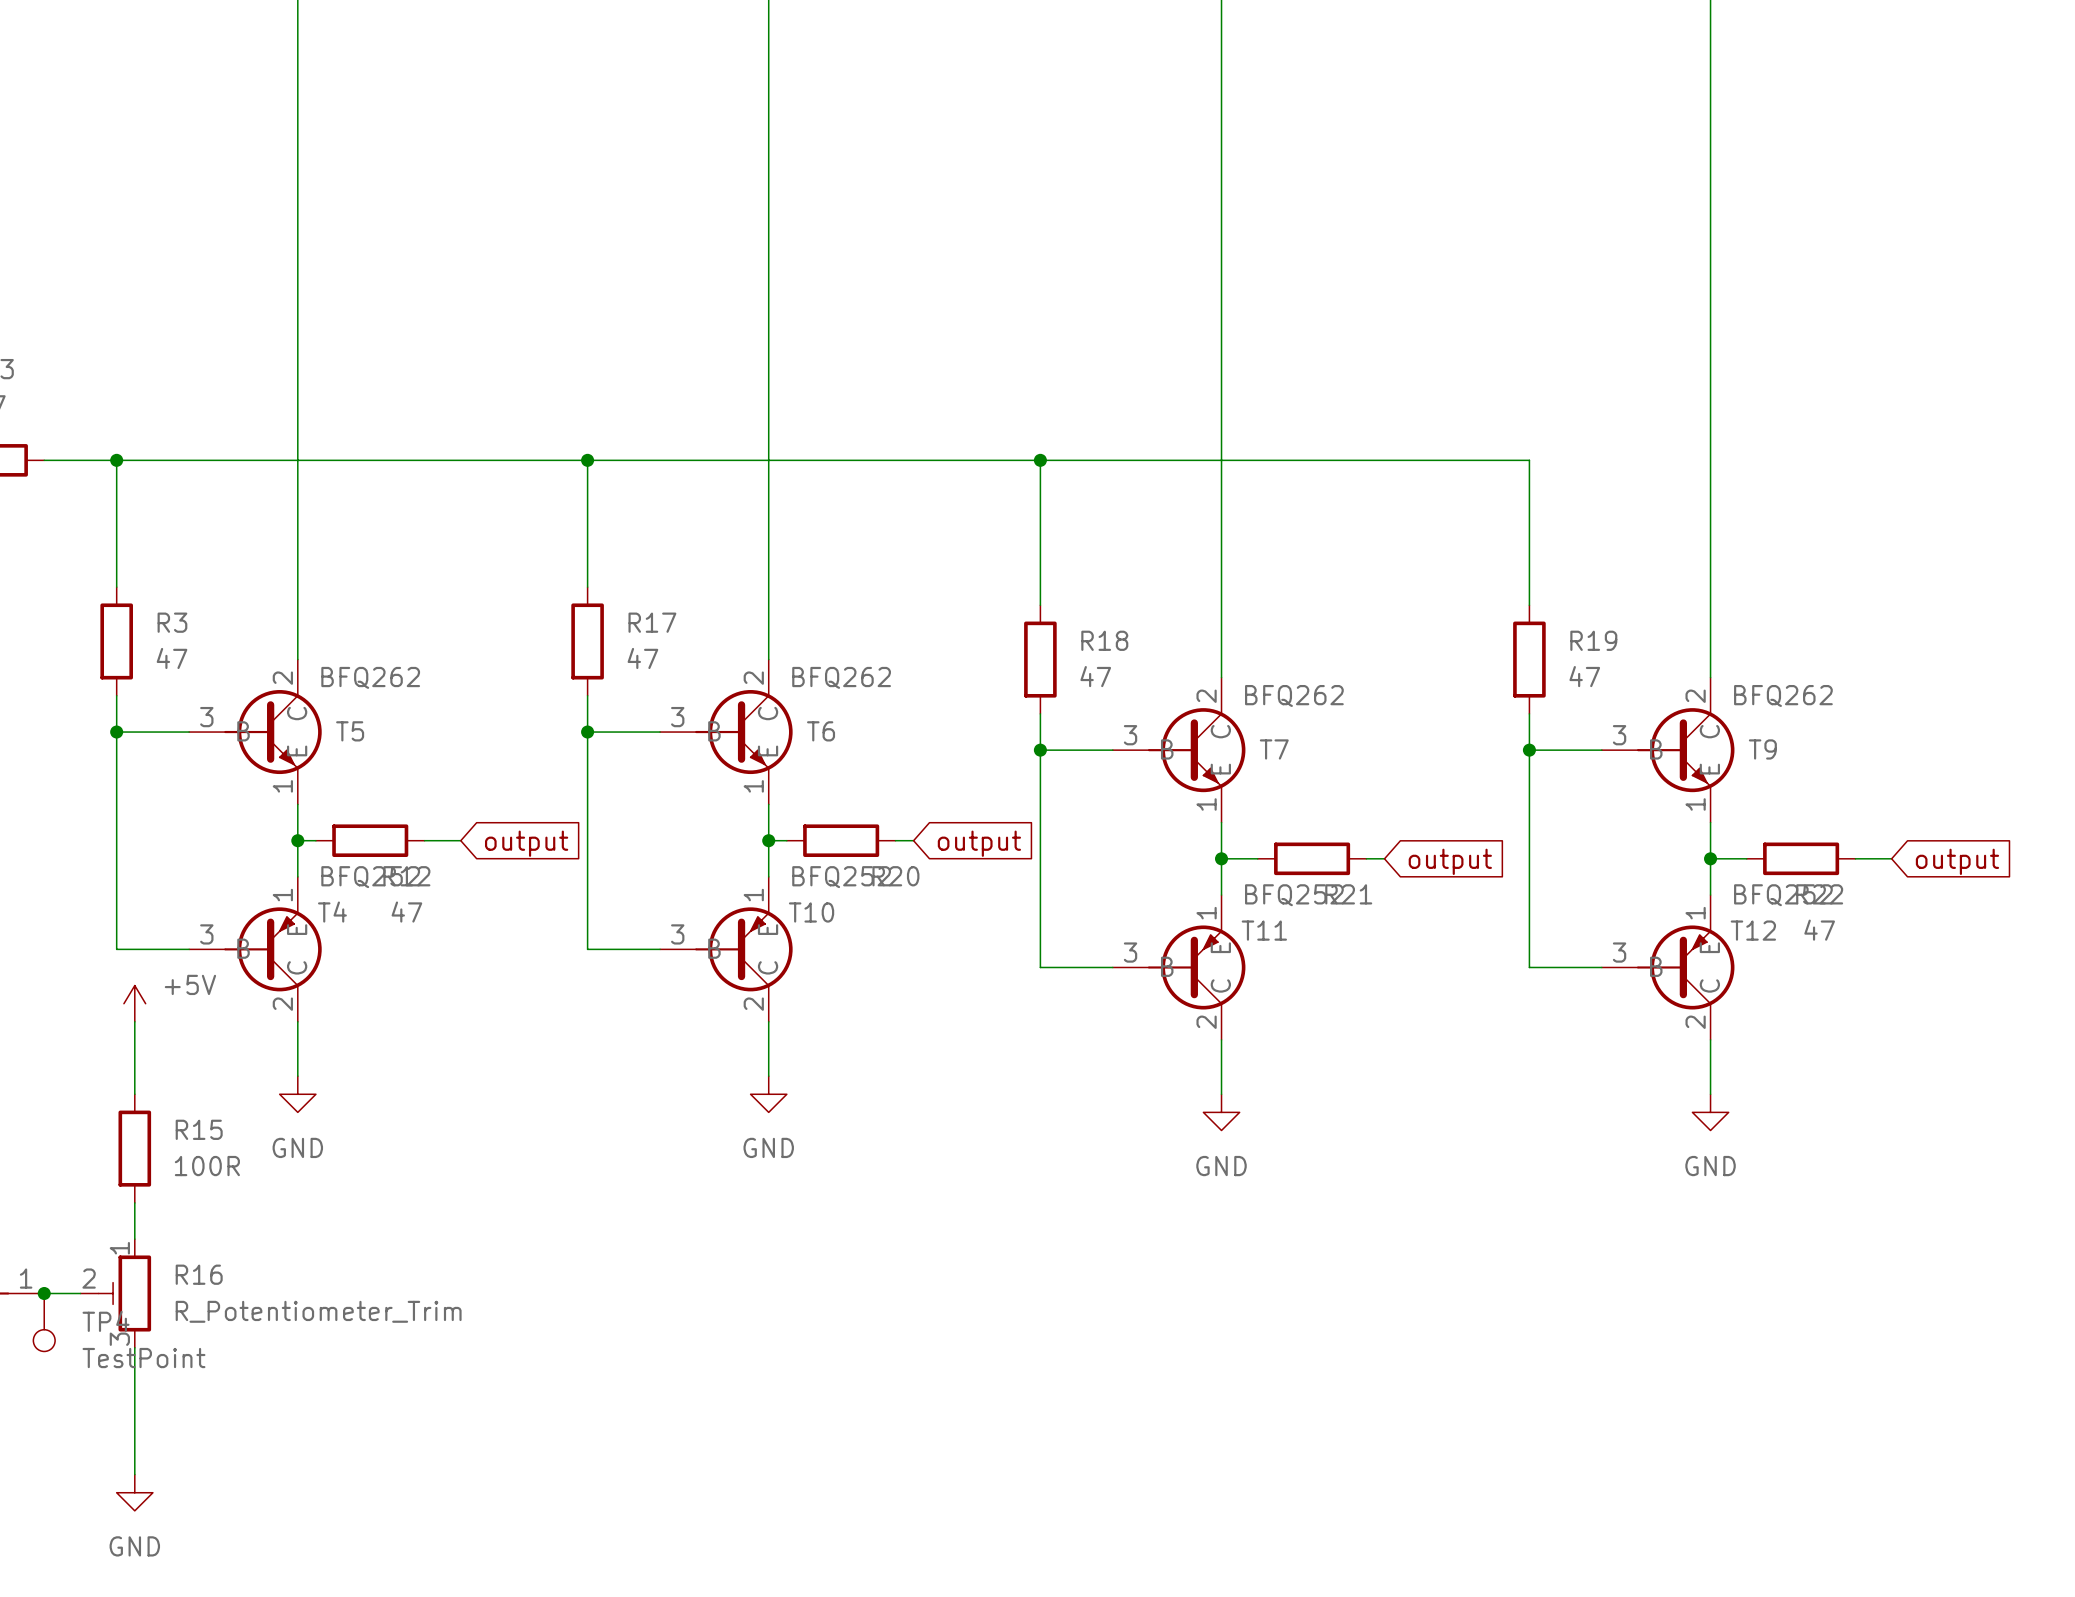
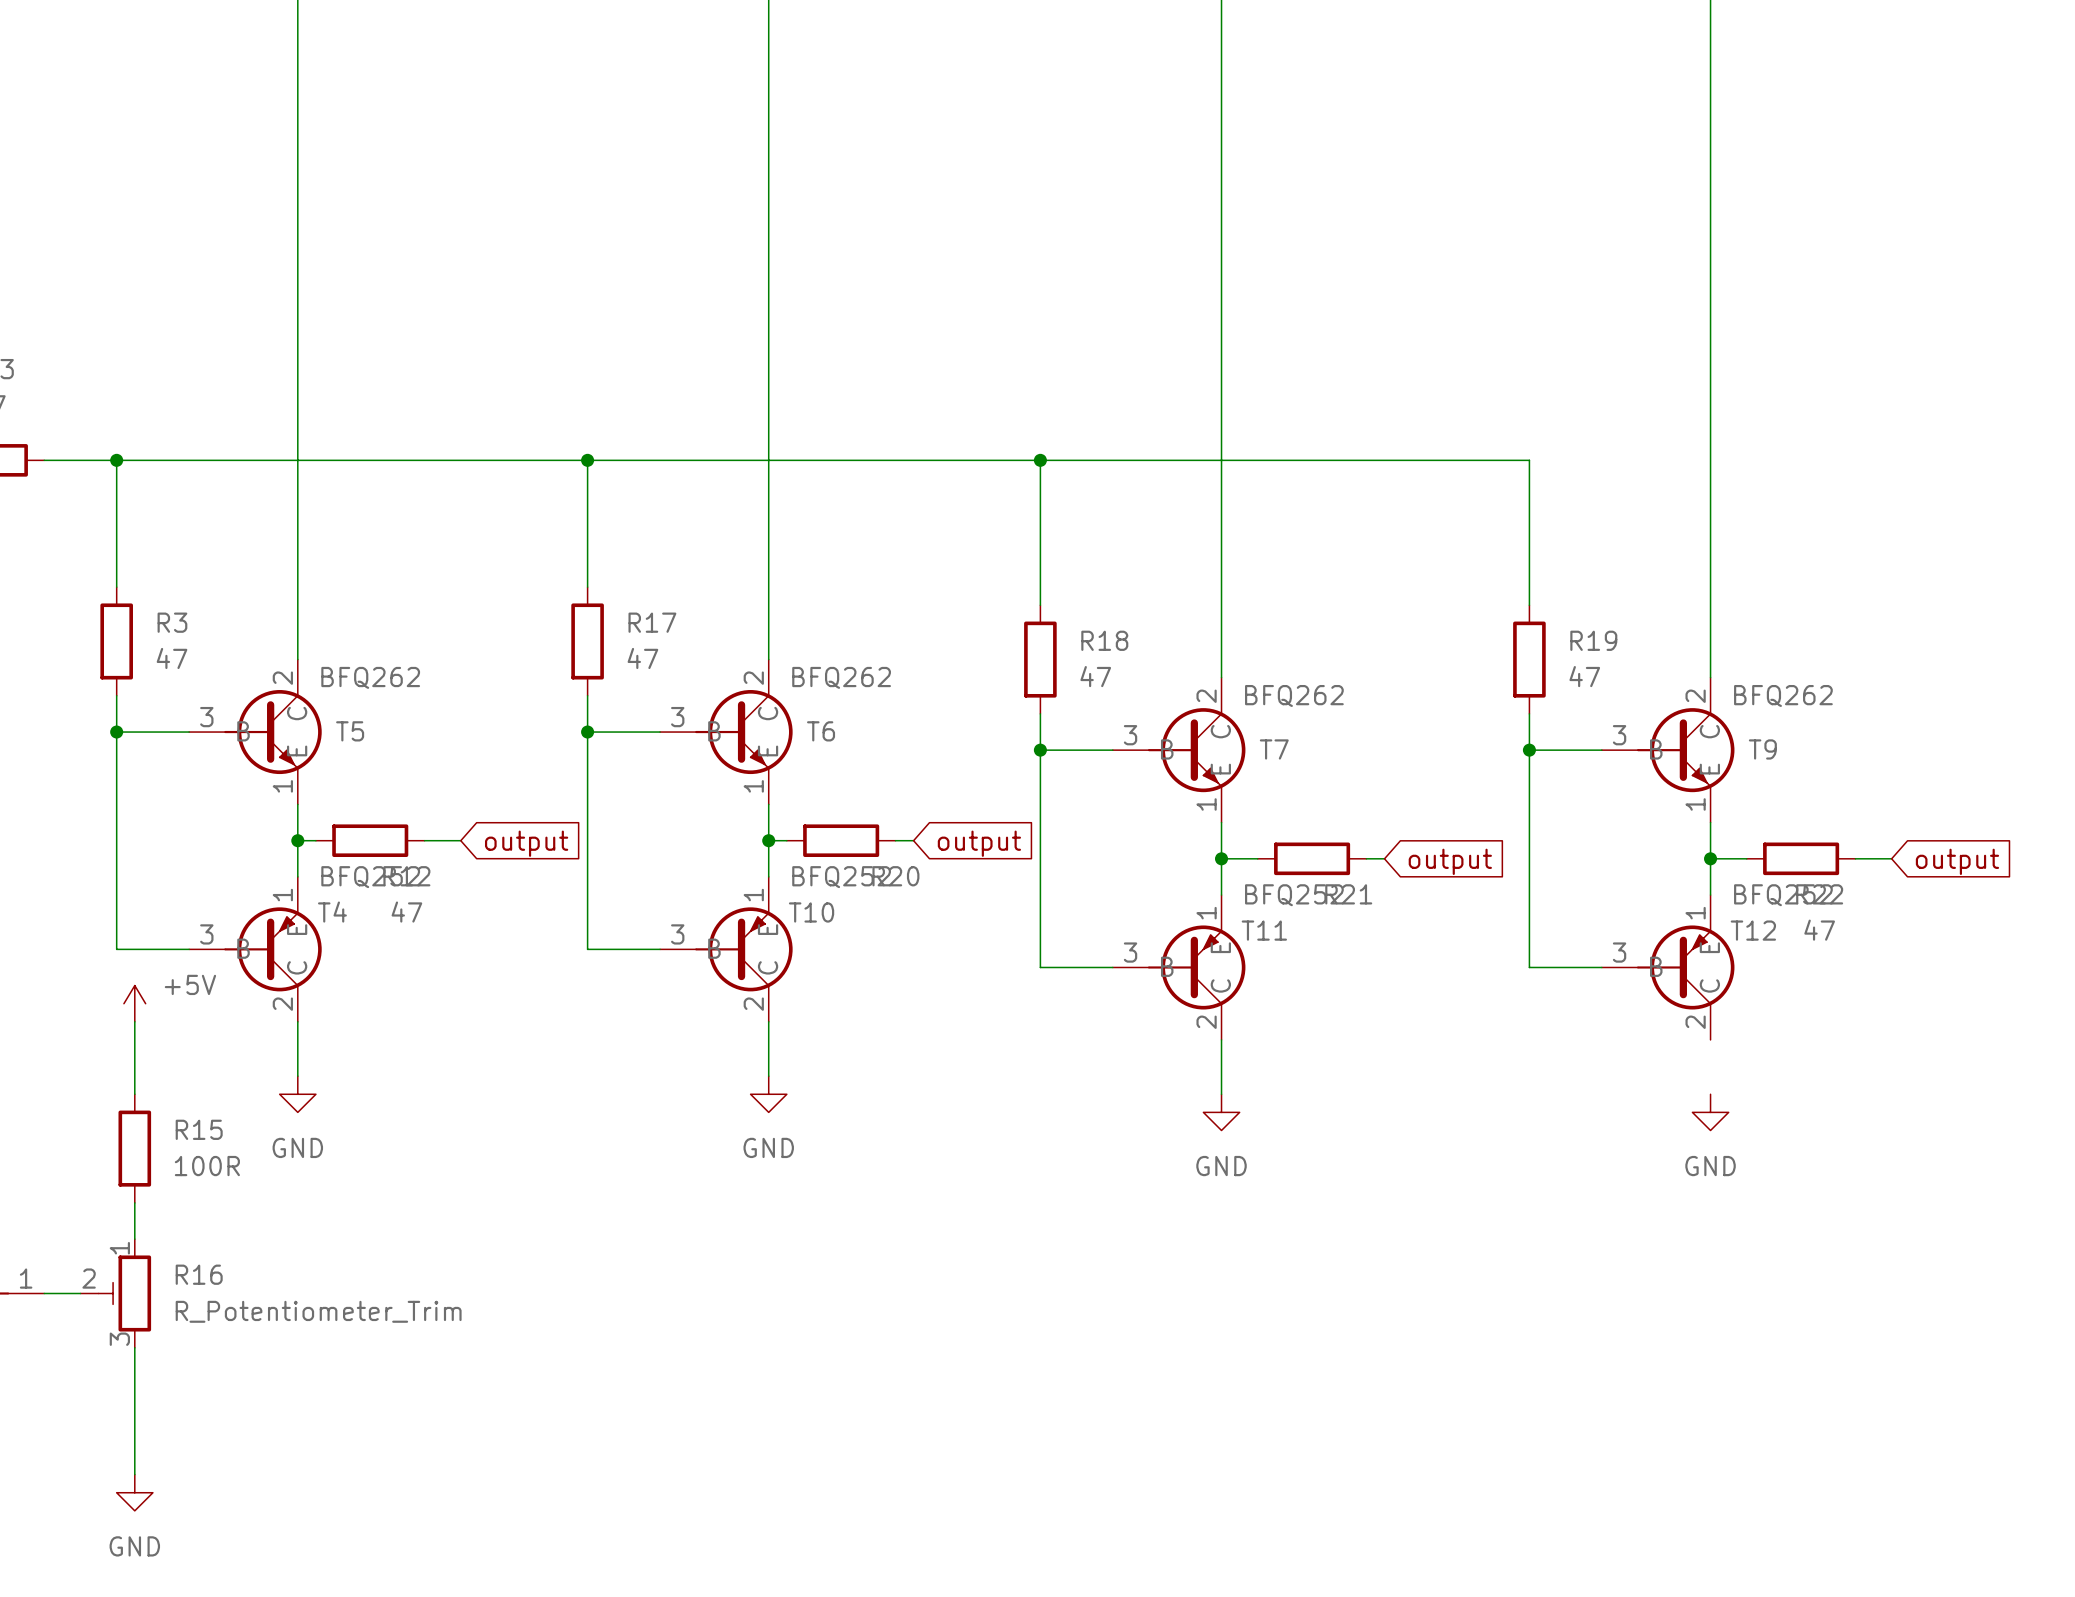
wire: (1710, 1039) (1710, 1094) -> none
junction: (44, 1293) -> none
TP4: TestPoint (44, 1322) -> none

